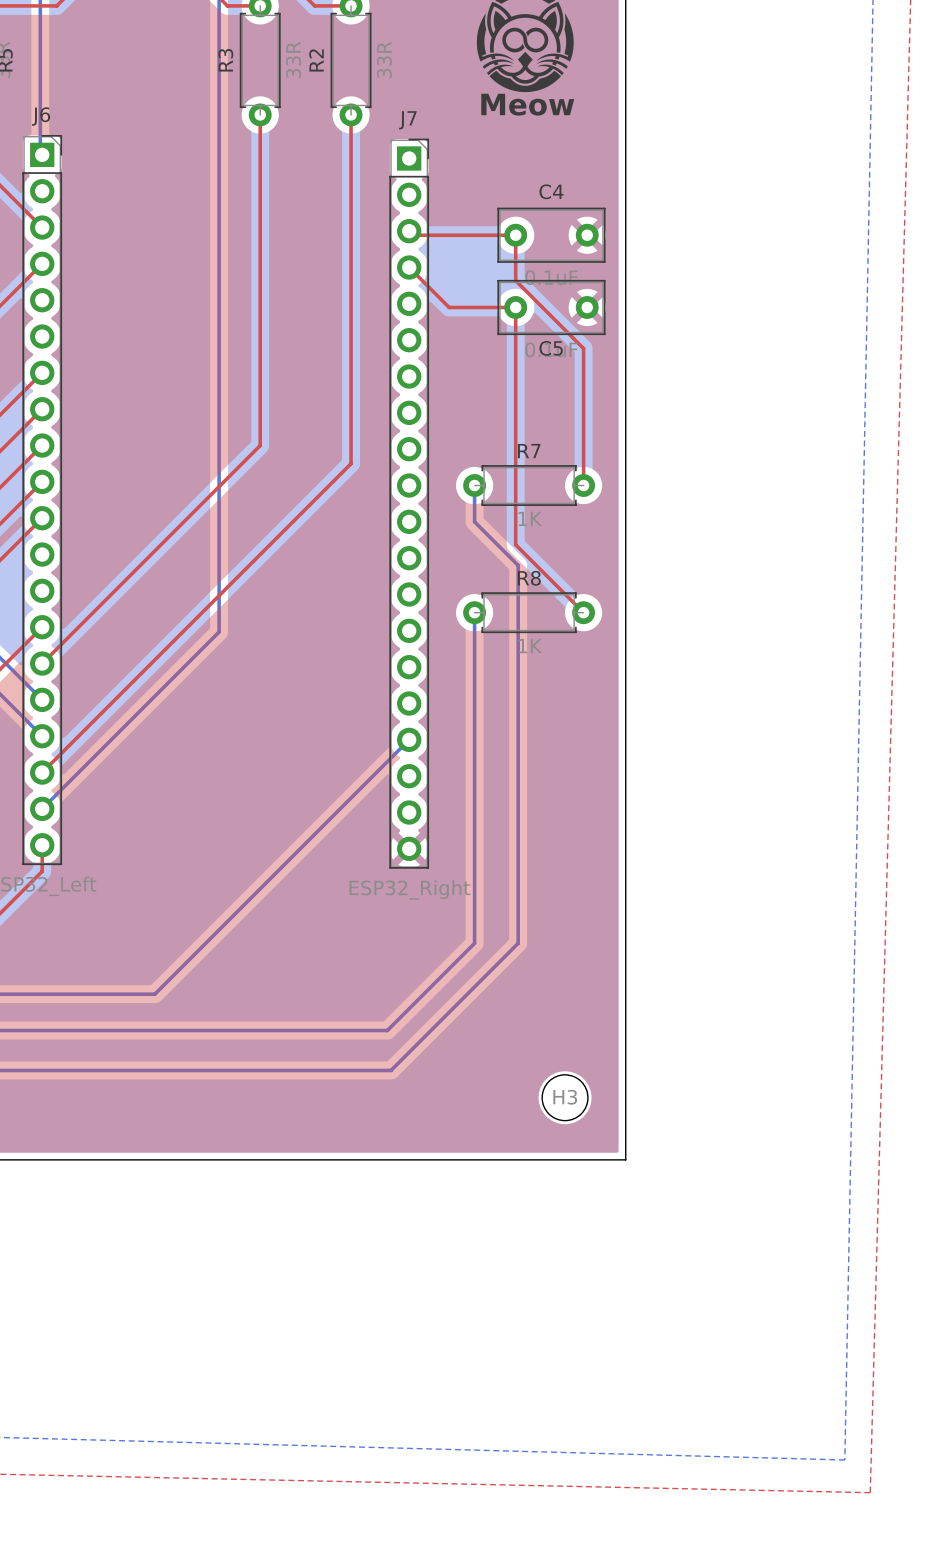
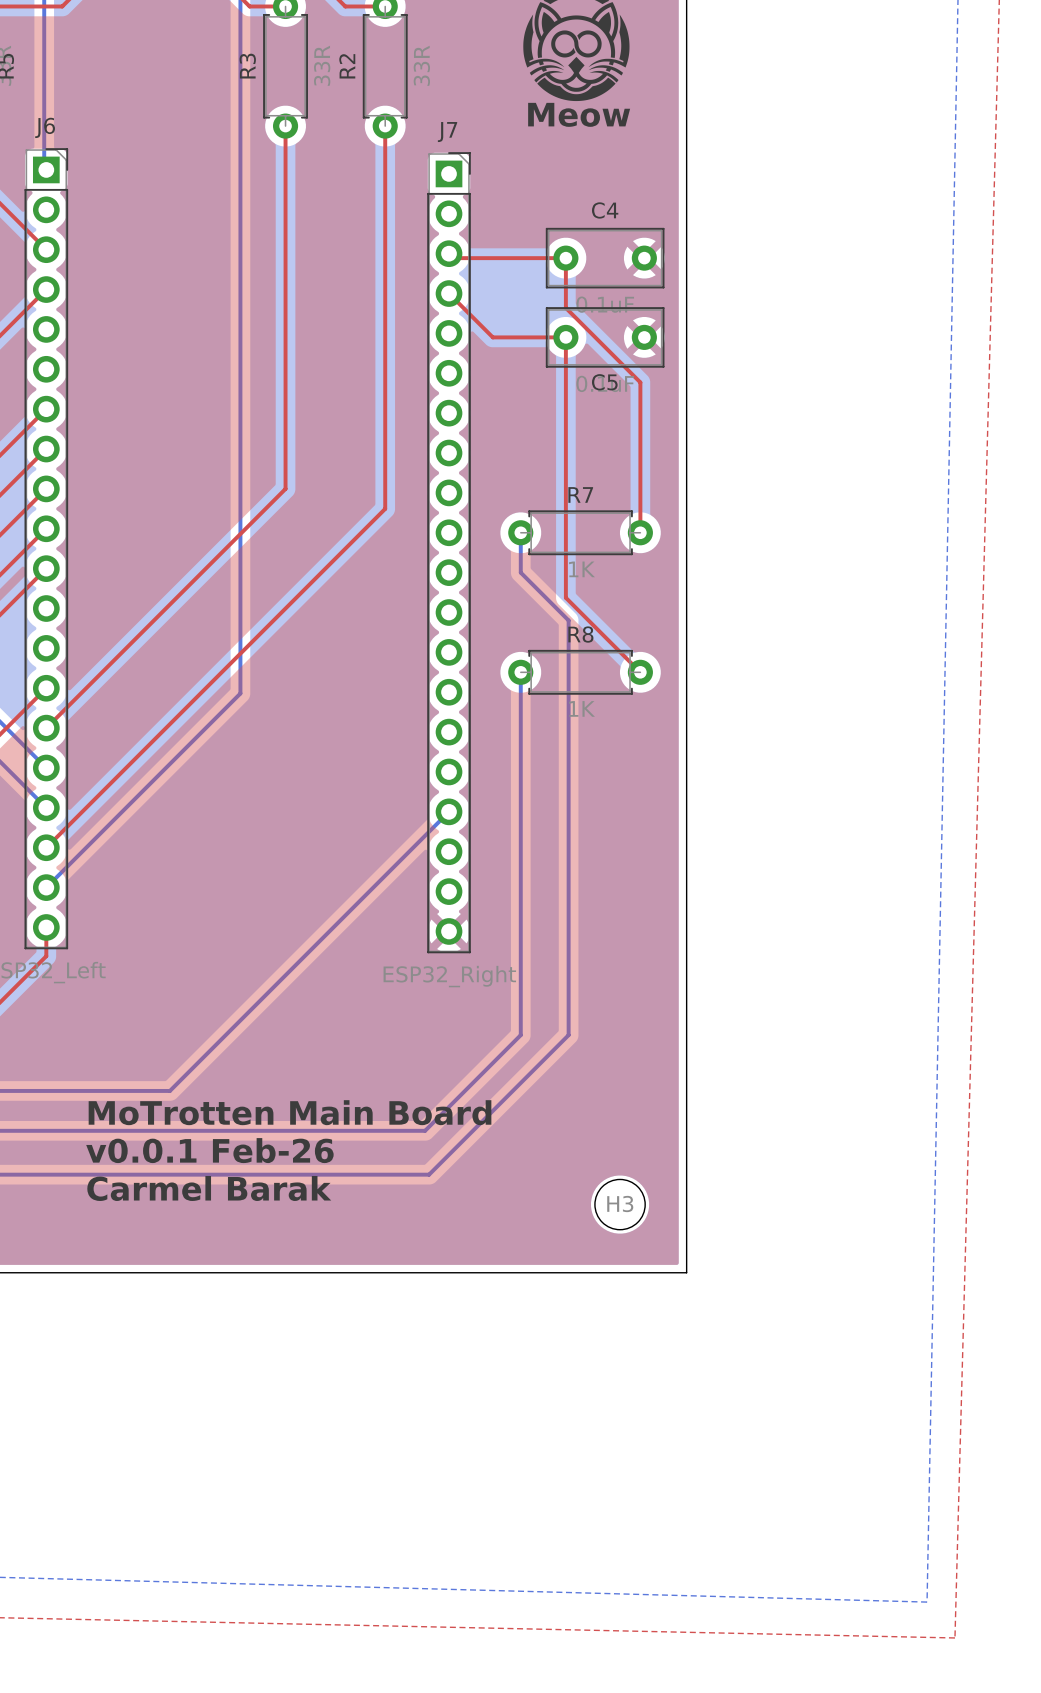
text: none -> MoTrotten Main Board (290, 1112)
text: none -> v0.0.1 Feb-26 (209, 1150)
text: none -> Carmel Barak (209, 1188)

